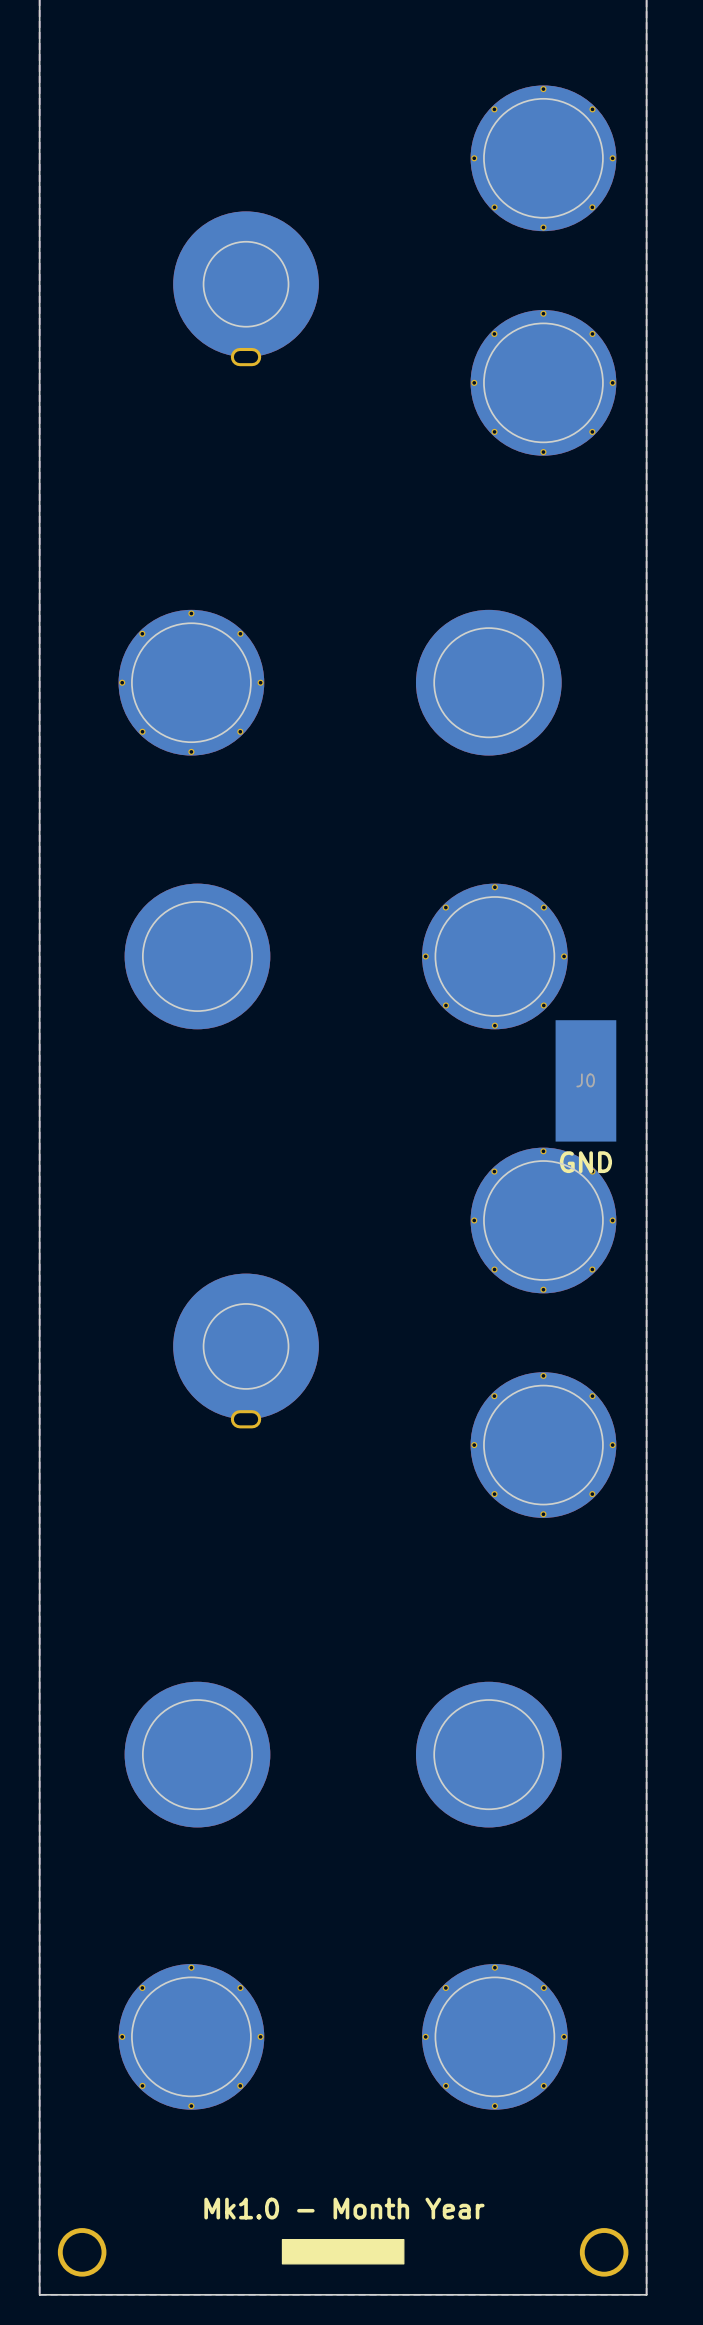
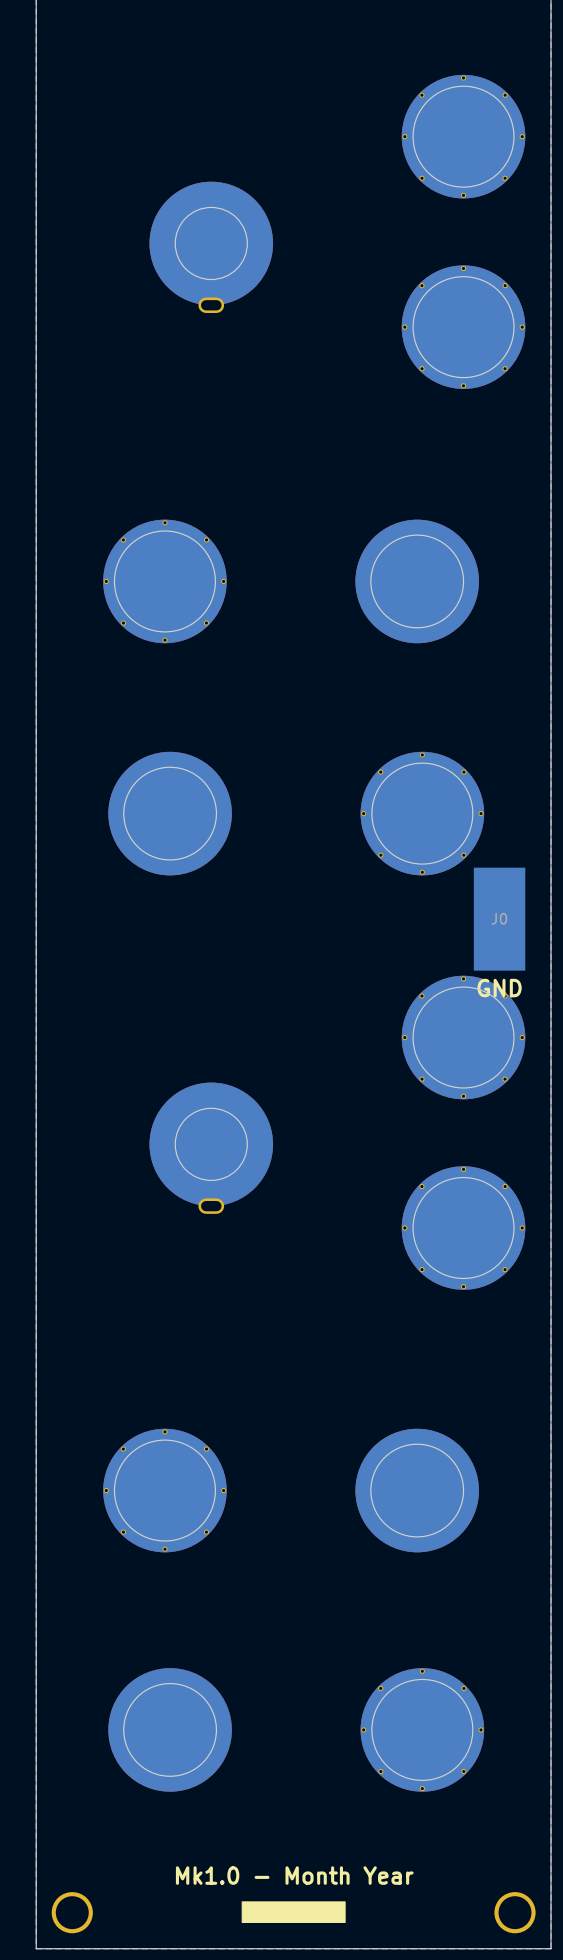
part footprint: [124, 1681, 271, 1828] -> [103, 1428, 227, 1553]
part footprint: [118, 1964, 265, 2110] -> [108, 1668, 232, 1792]

